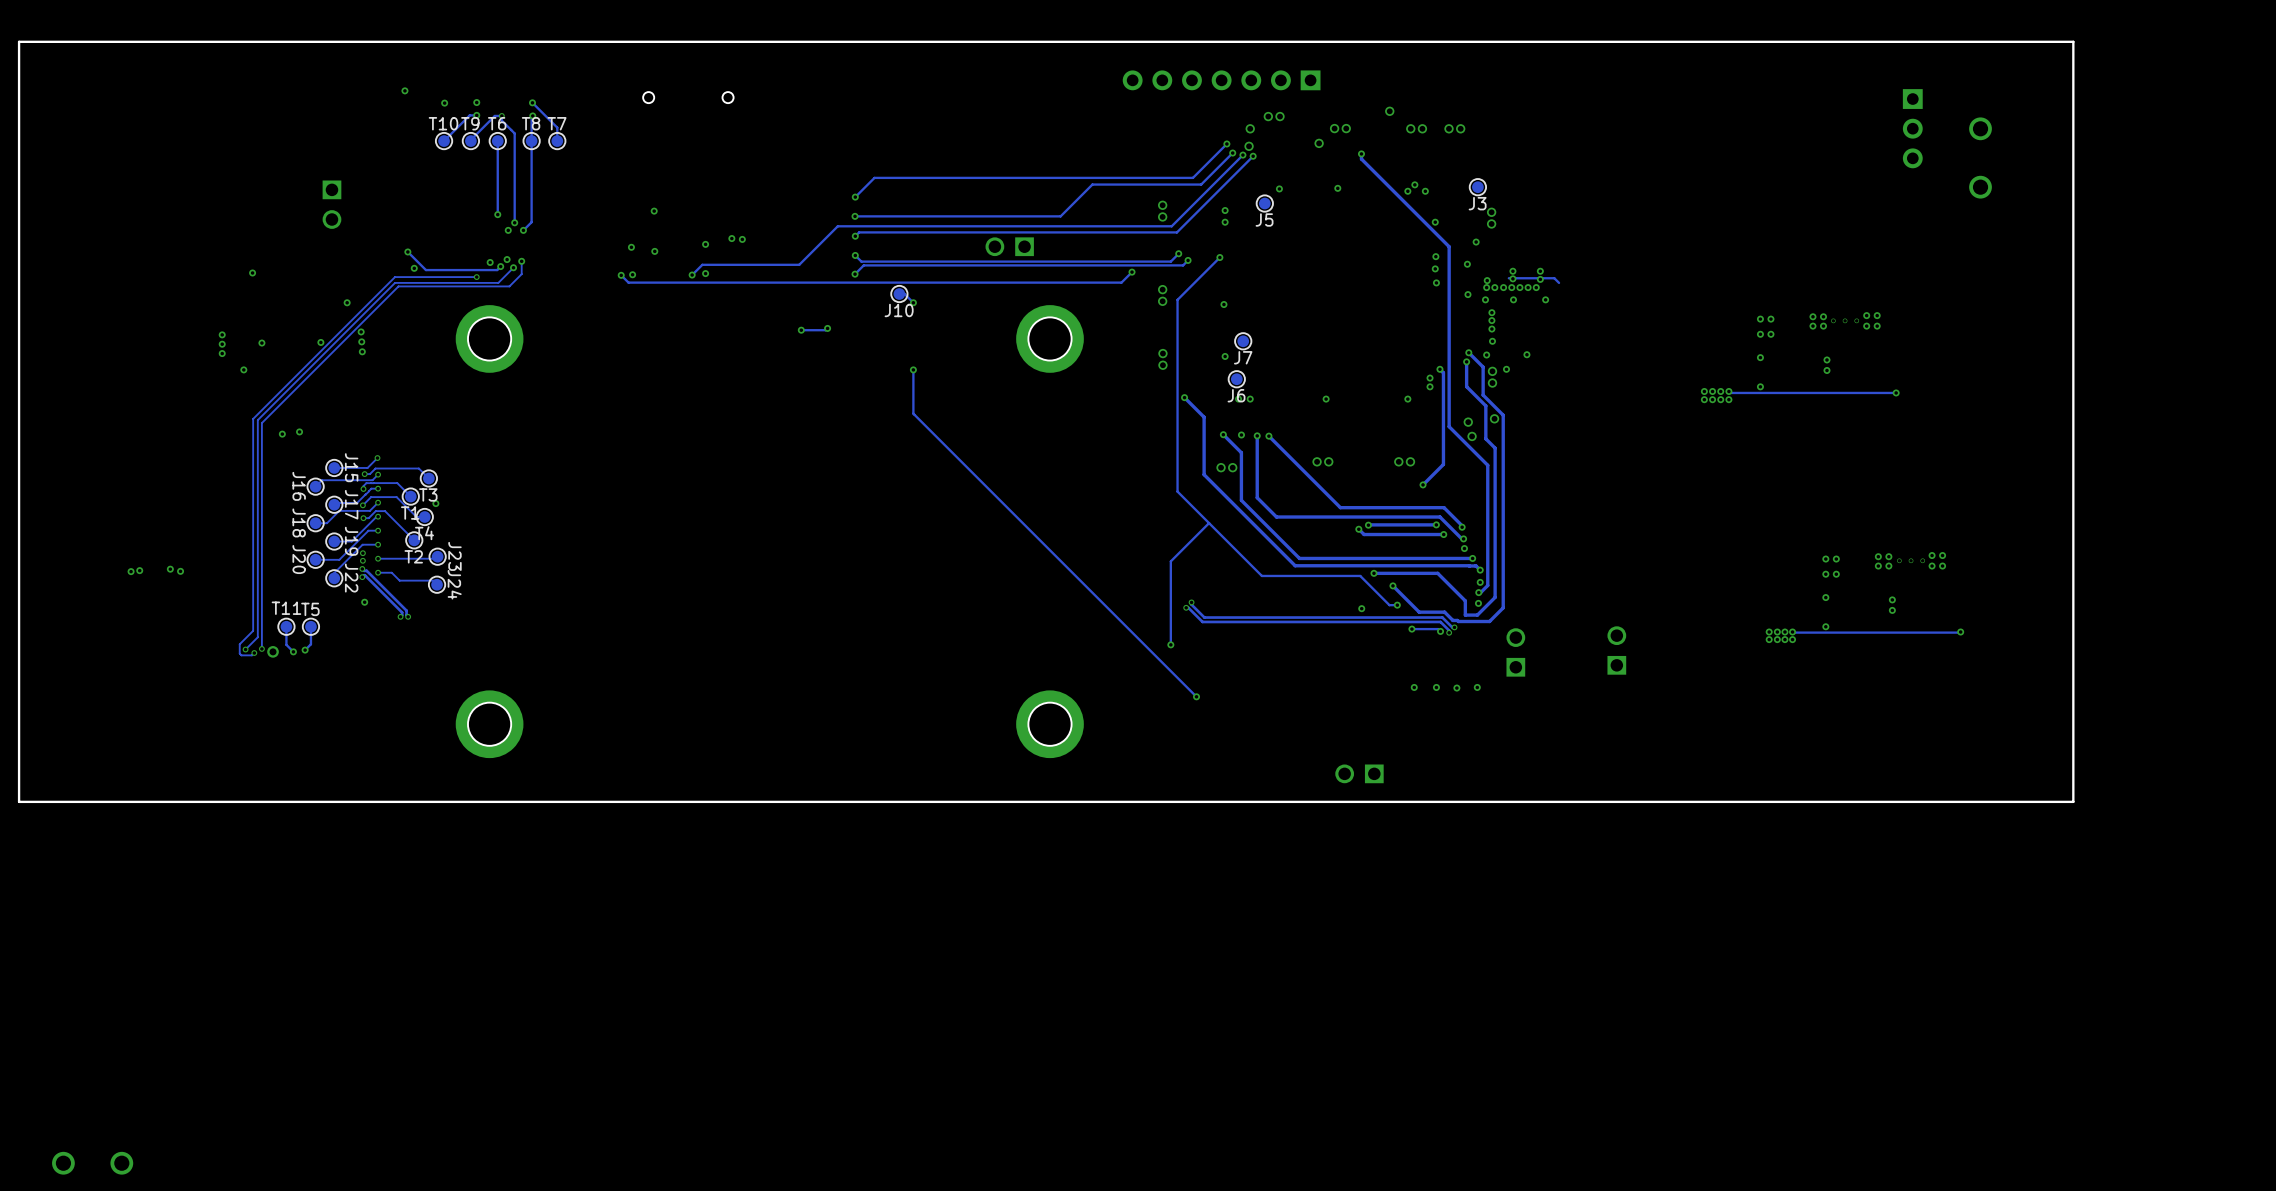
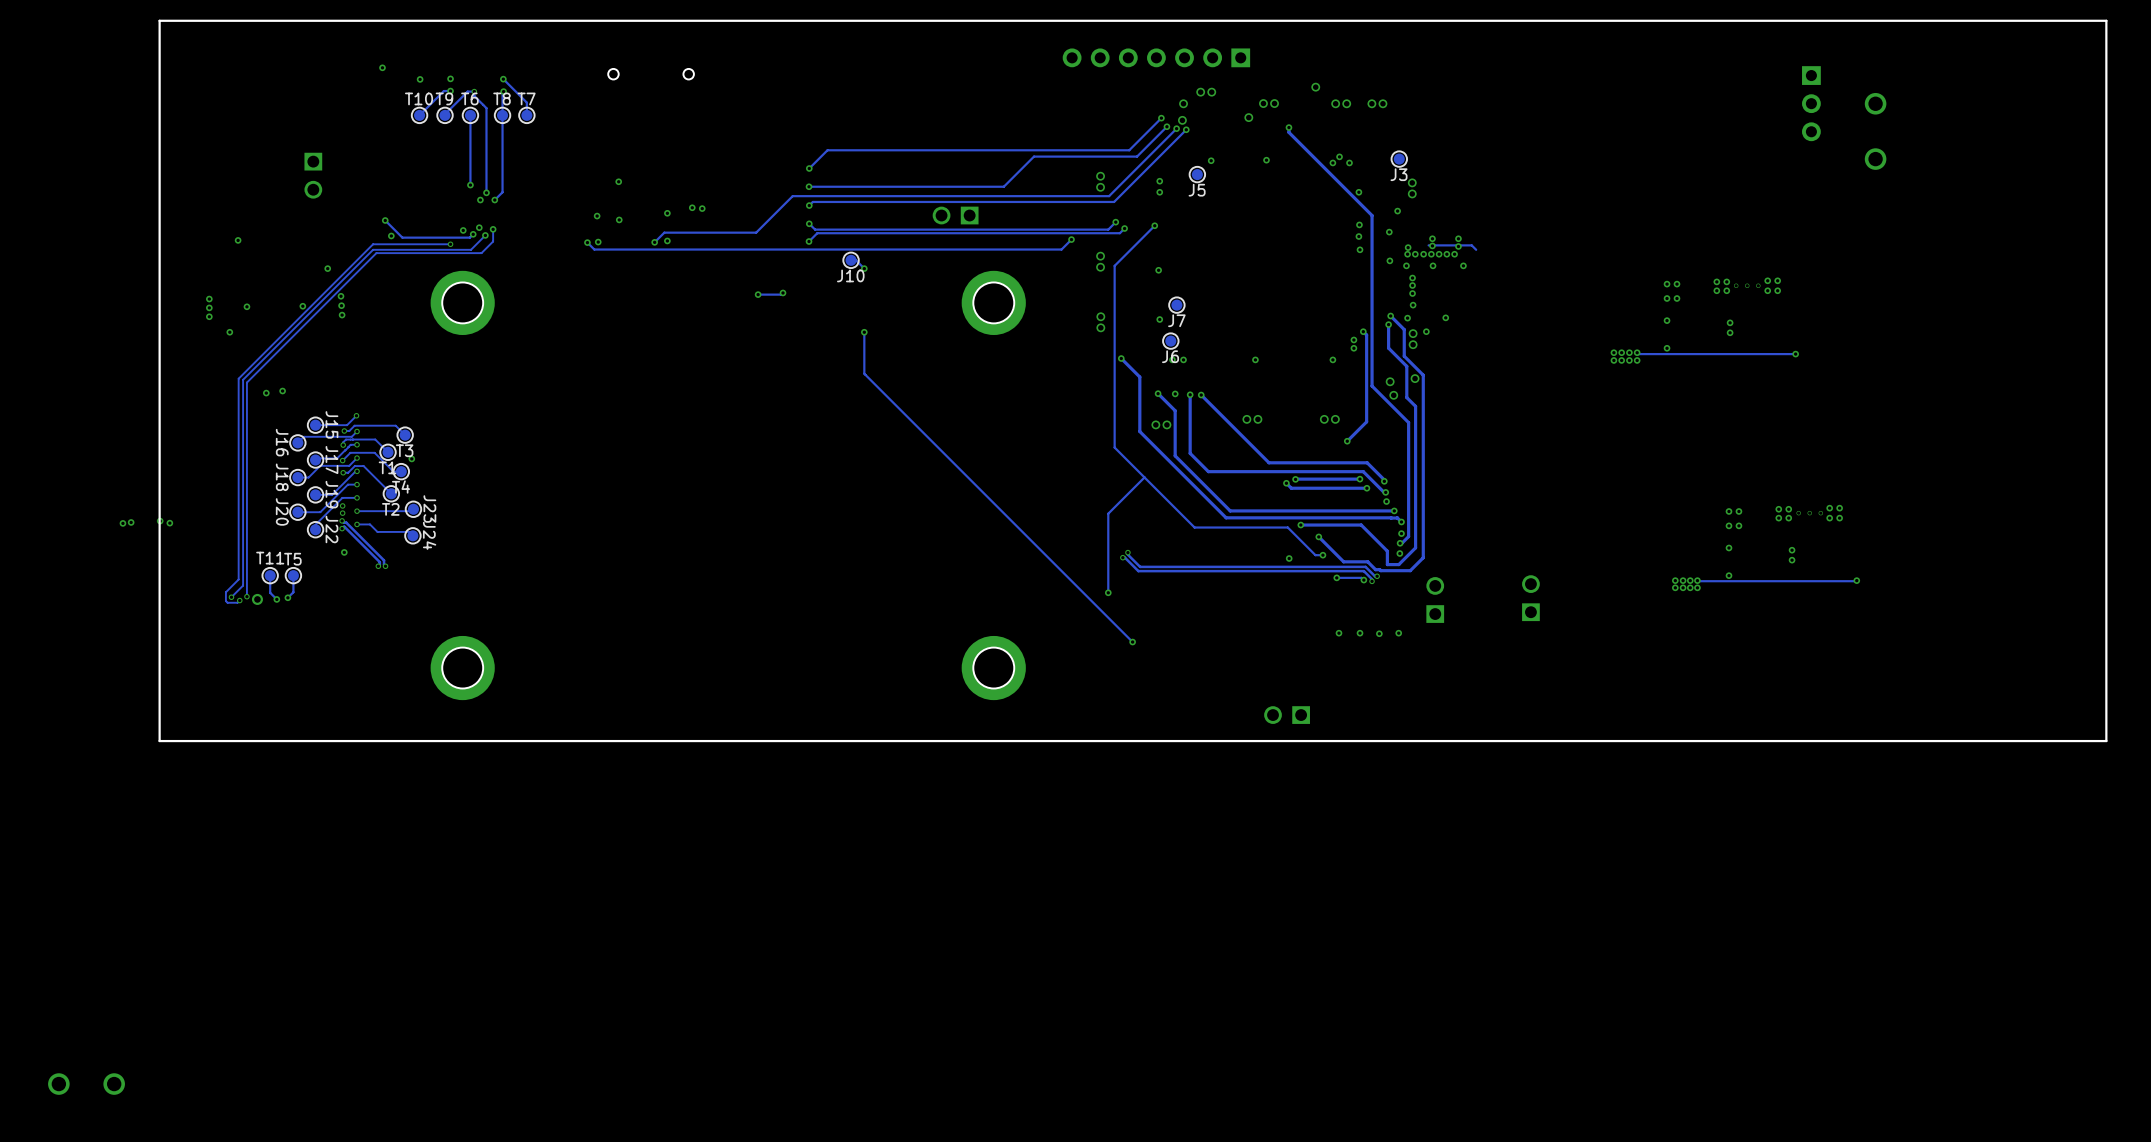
board edge: (2073, 41) (19, 41) (19, 801) (2073, 801) (2073, 41) -> (2106, 20) (2106, 741) (159, 741) (159, 20) (2106, 20)

